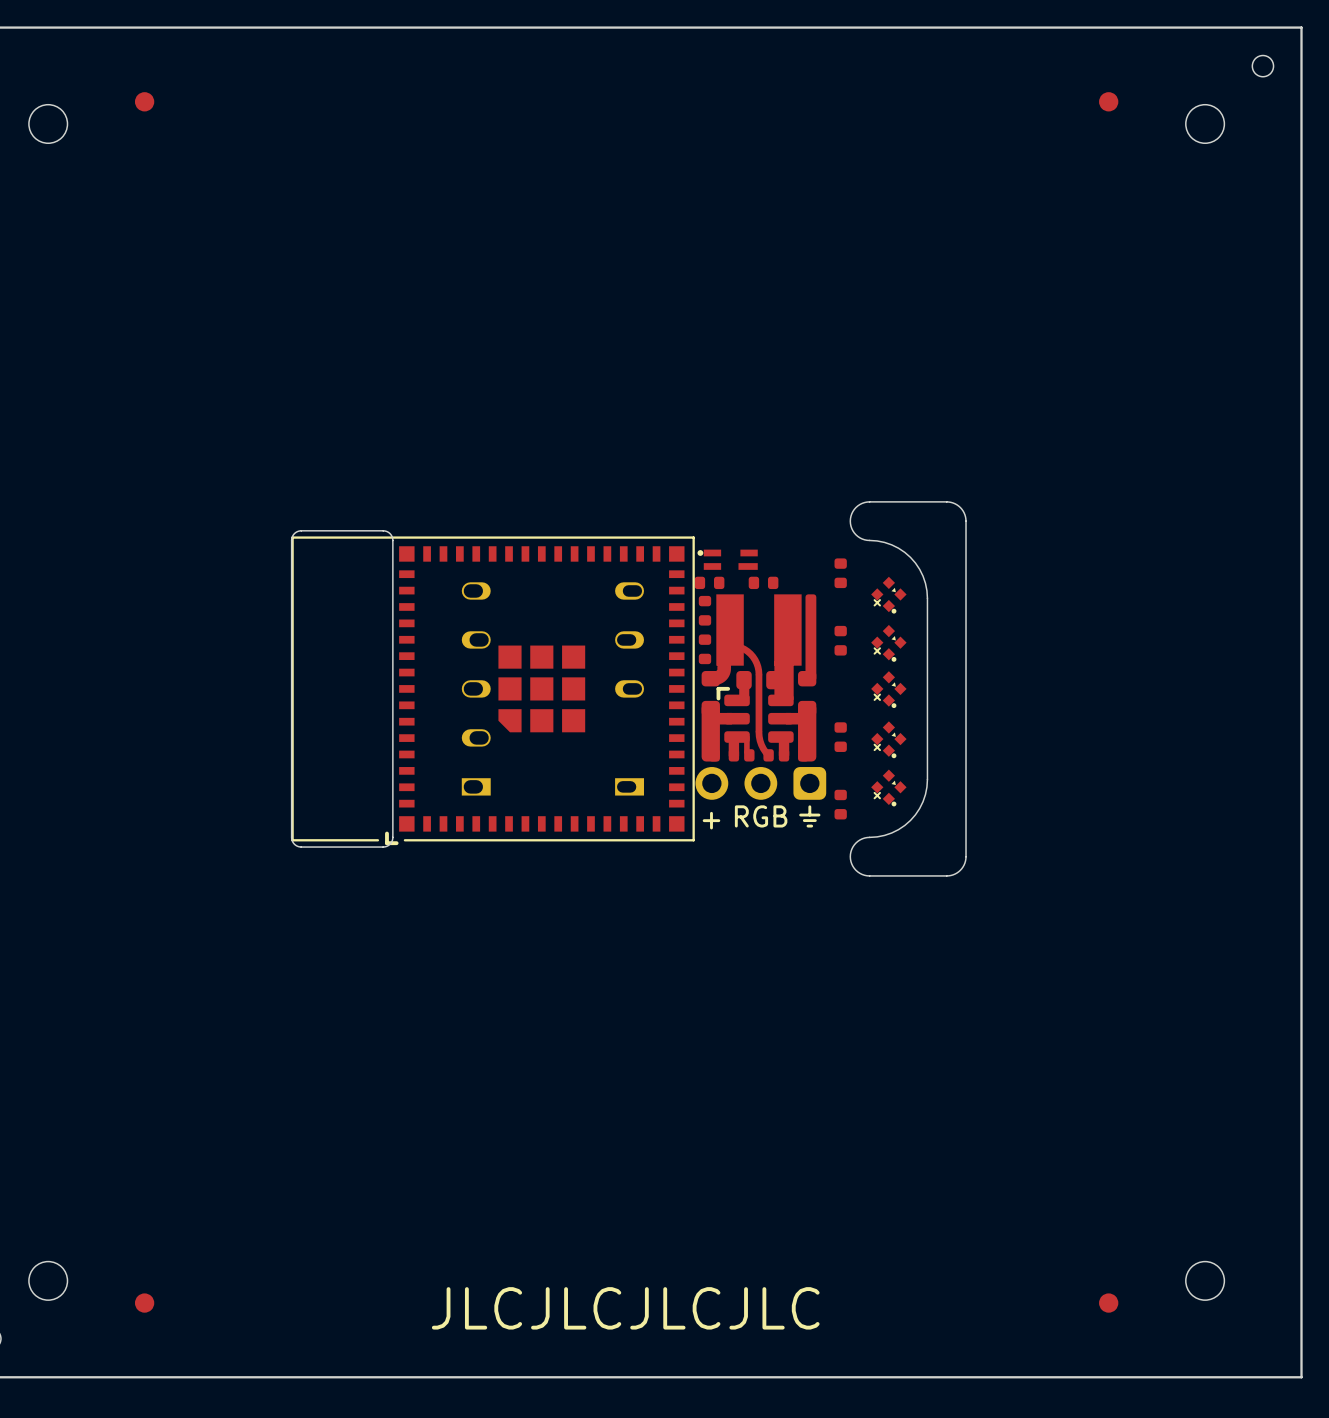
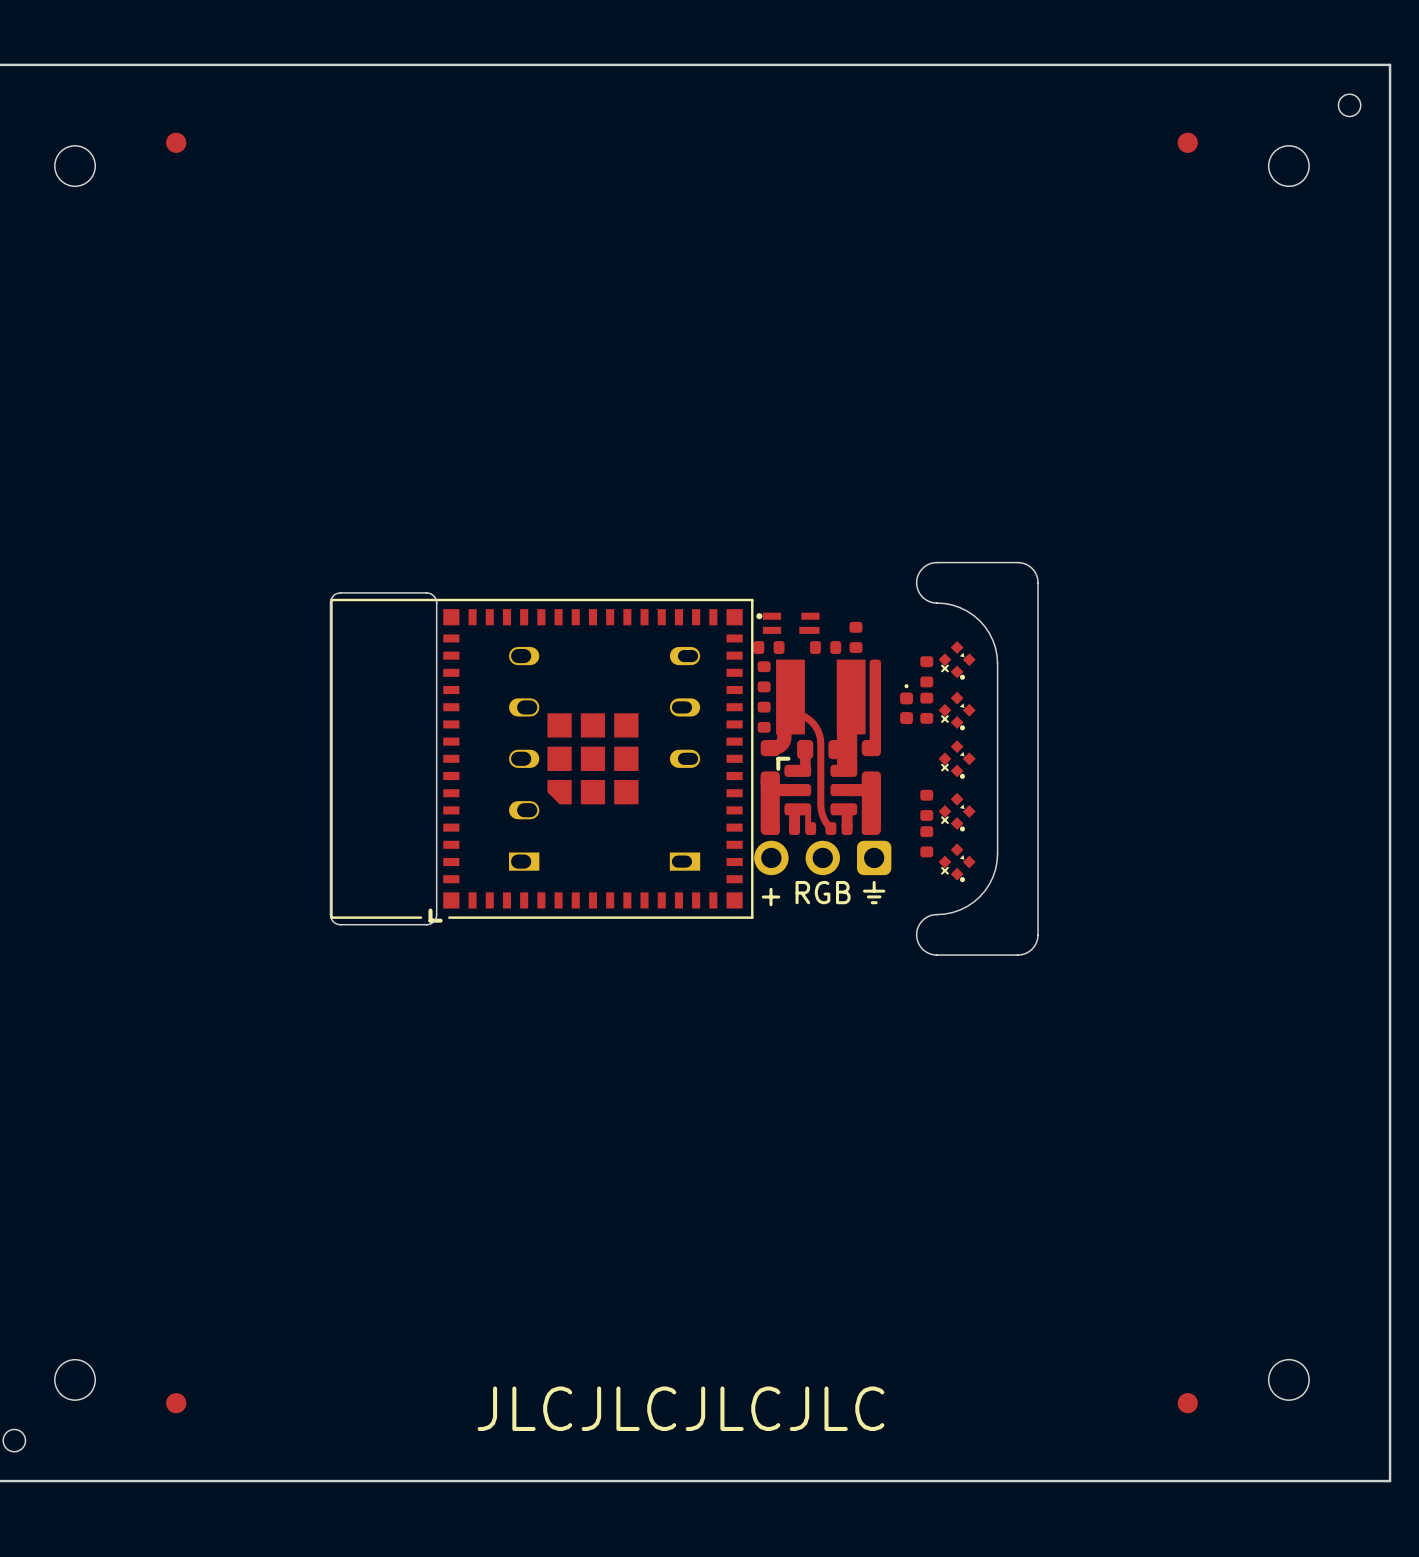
part: none -> (855, 637)
part: (840, 573) -> none
part: none -> (926, 671)
part footprint: [834, 625, 847, 656] -> [900, 684, 914, 725]
part: none -> (926, 708)
part: none -> (926, 805)
part: (840, 737) -> none
part: none -> (926, 841)
part: (840, 804) -> none

